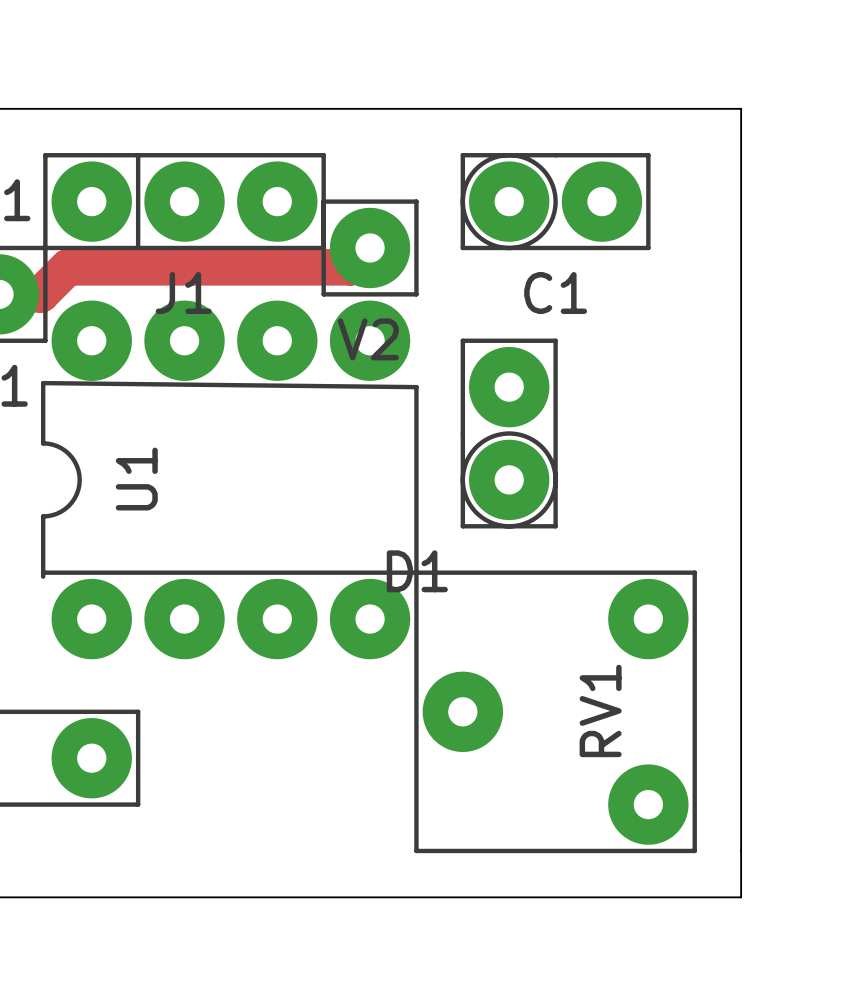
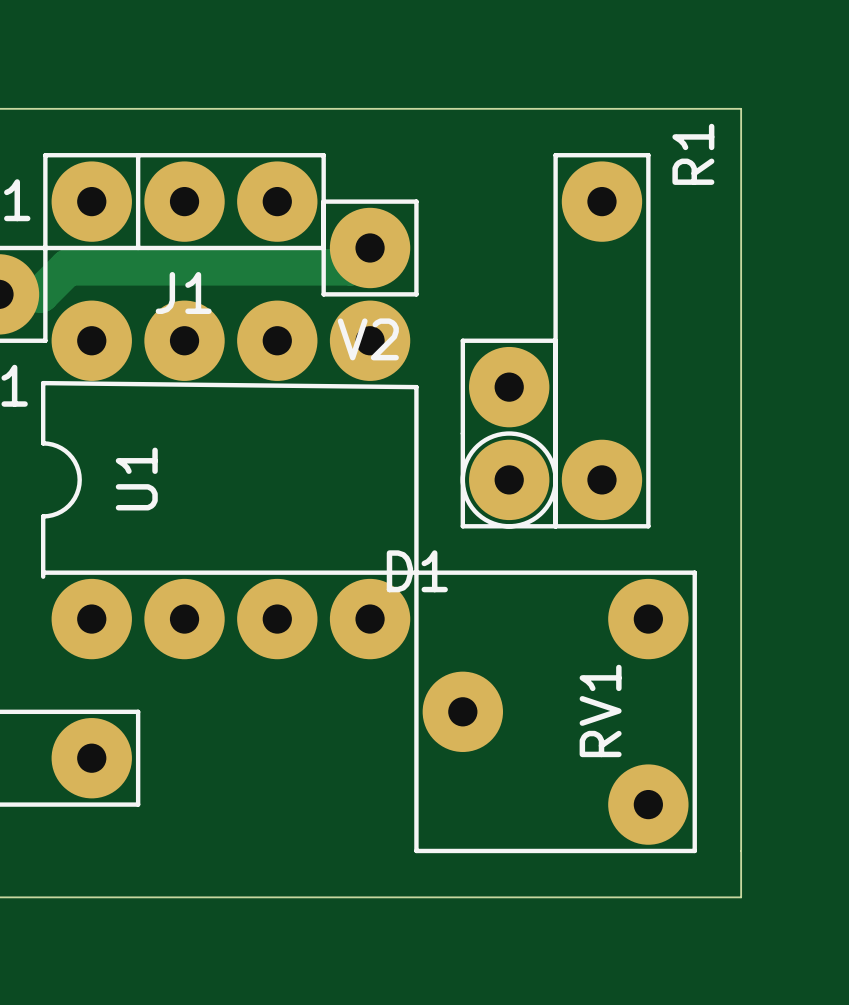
C1: (555, 201) -> none
R1: none -> (601, 340)

